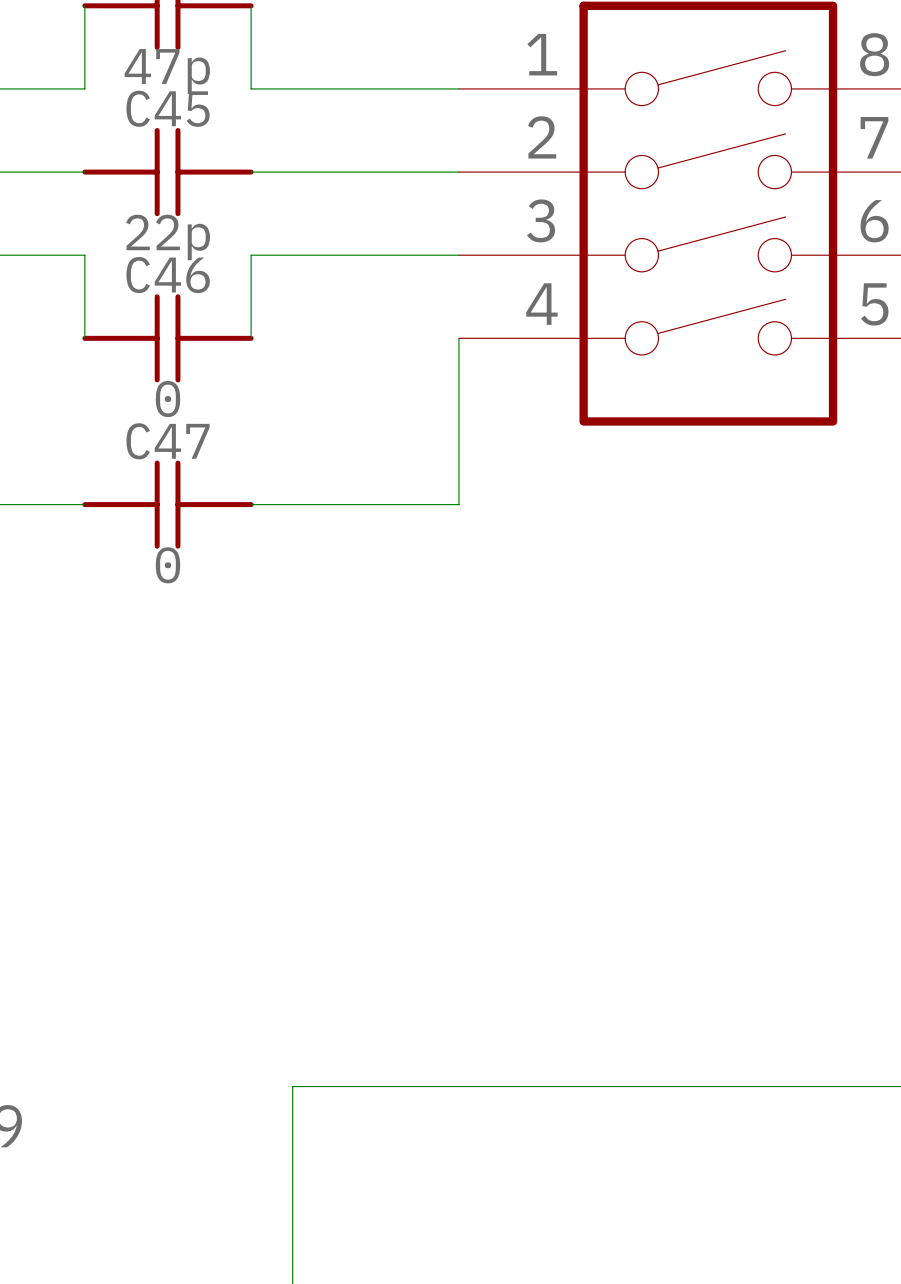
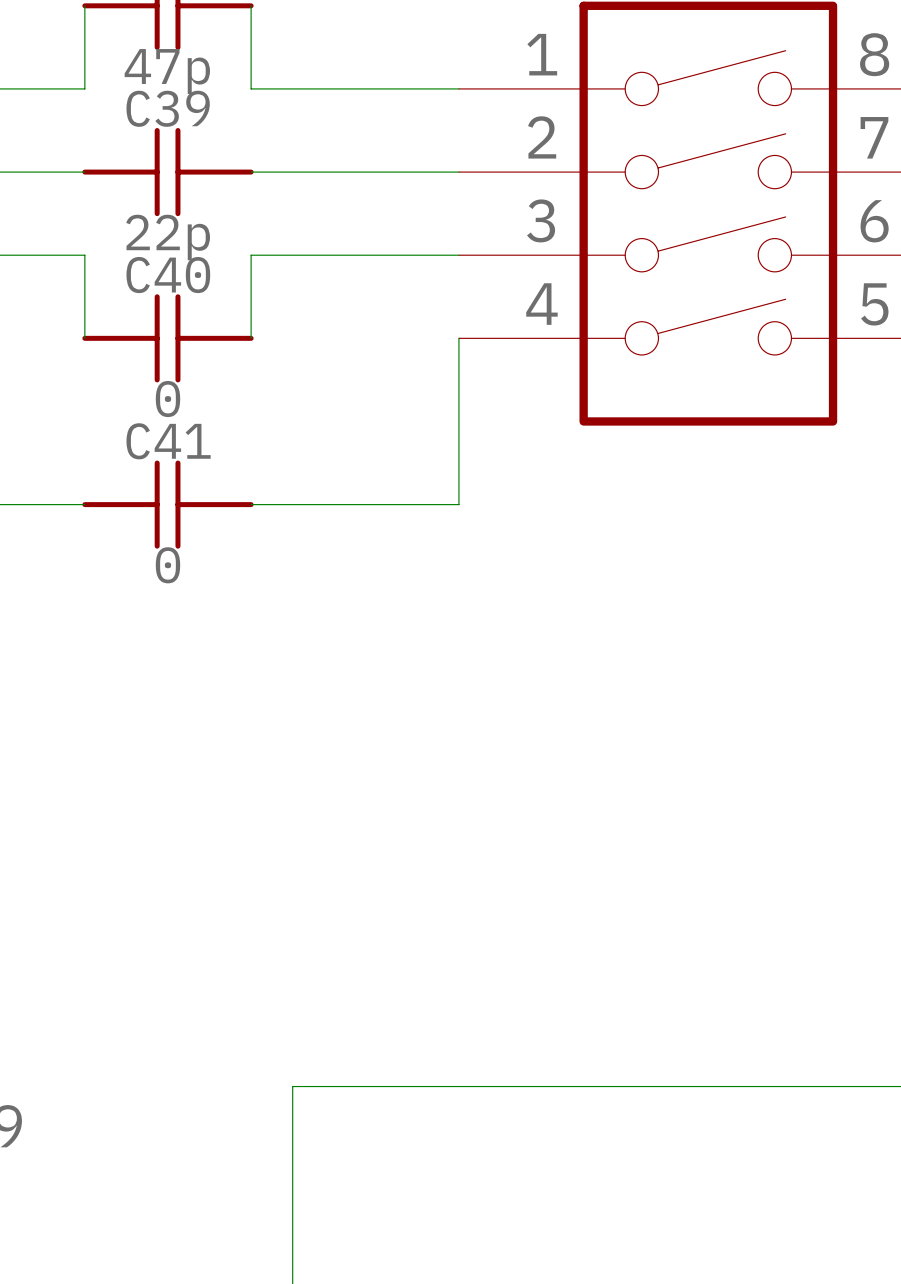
C45 name: C45 (168, 108) -> C39 (168, 108)
C46 name: C46 (168, 275) -> C40 (168, 275)
C47 name: C47 (168, 441) -> C41 (168, 441)

